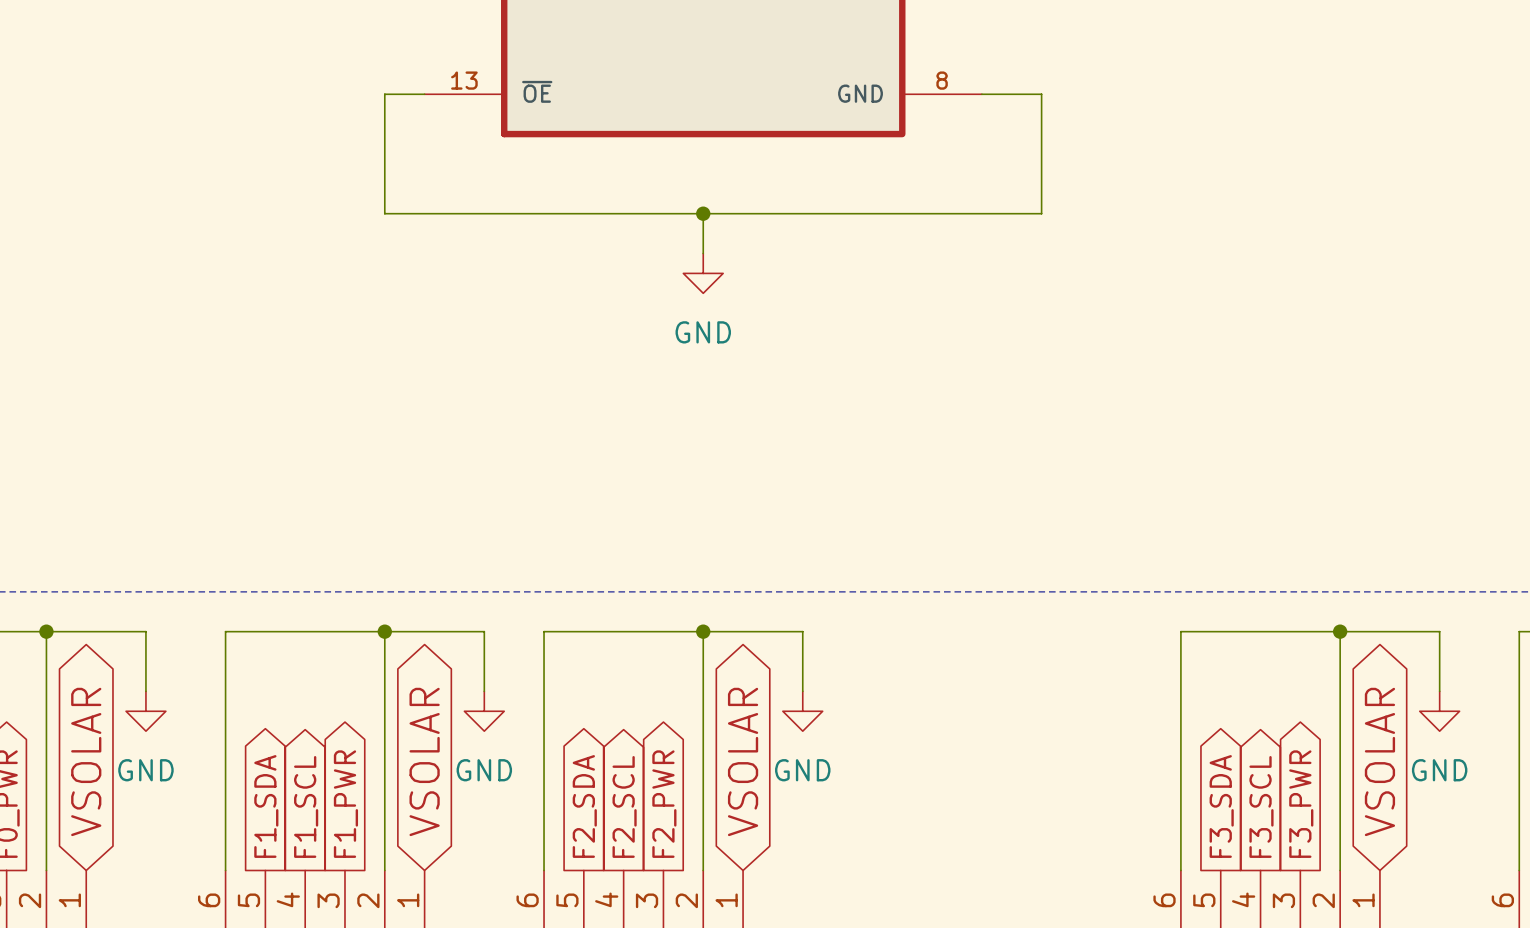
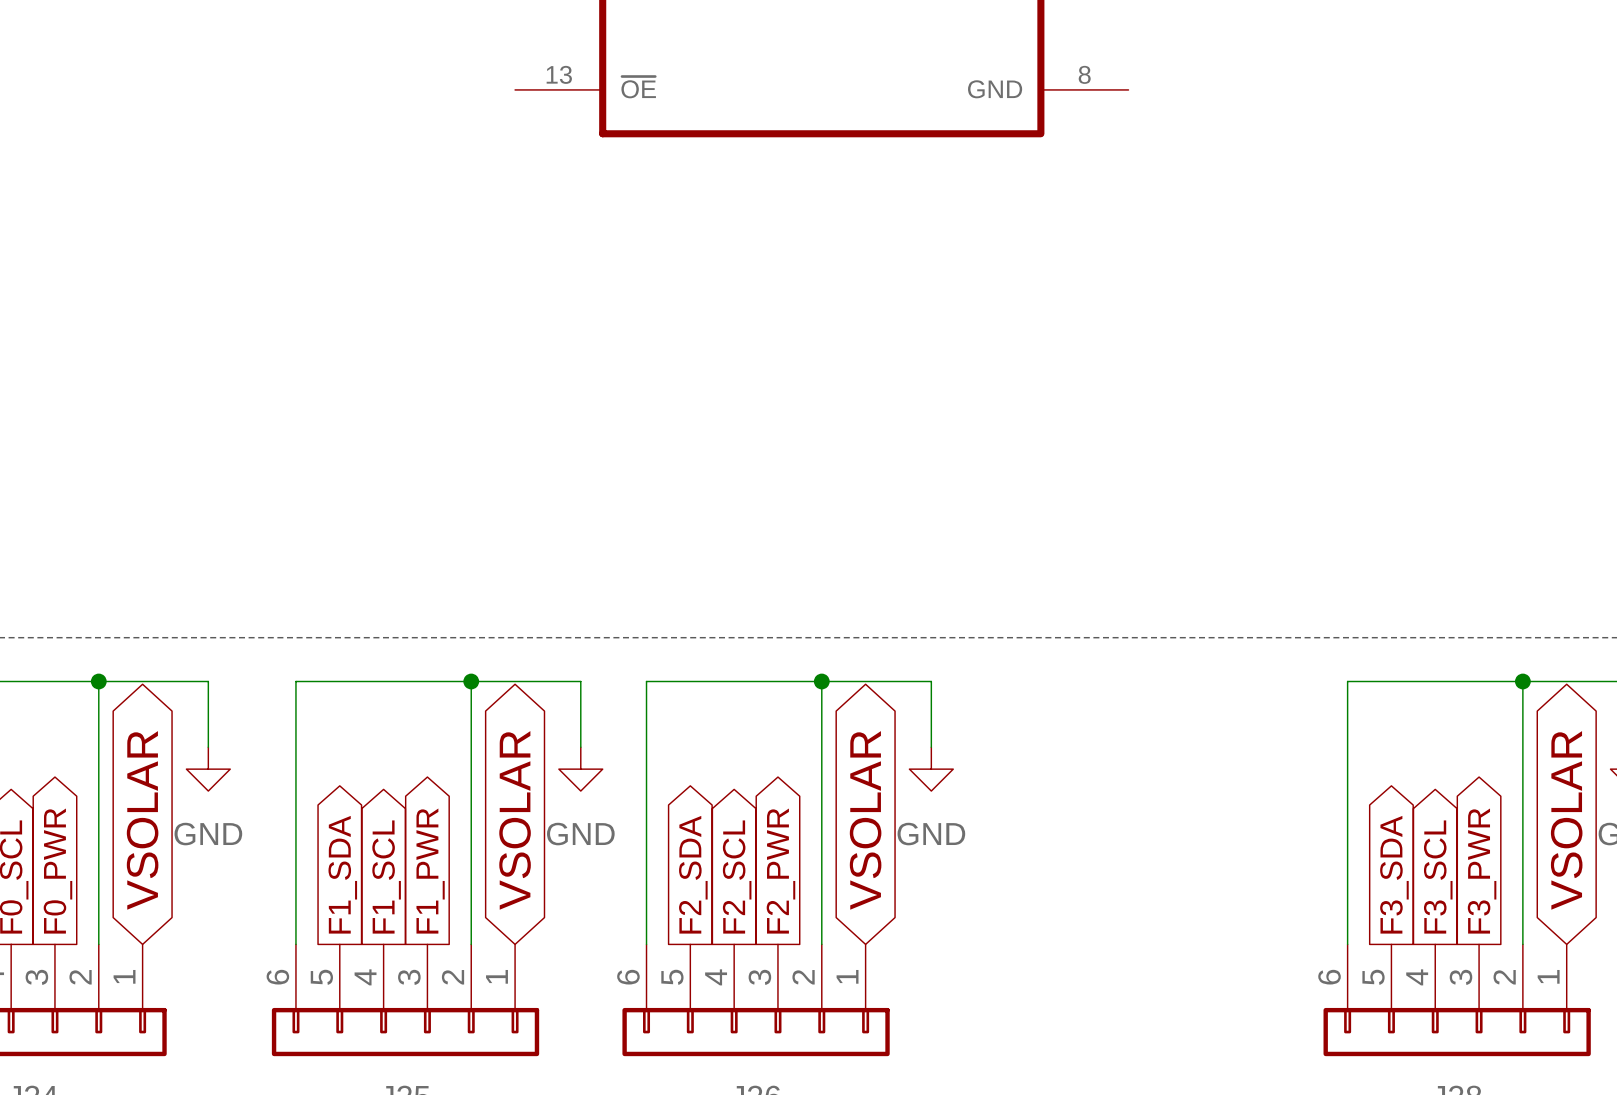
wire: (424, 94) (384, 94) (384, 213) (1041, 213) (1041, 94) (981, 94) -> none
wire: (703, 213) (703, 253) -> none
junction: (703, 213) -> none
power symbol: GND (703, 273) -> none

